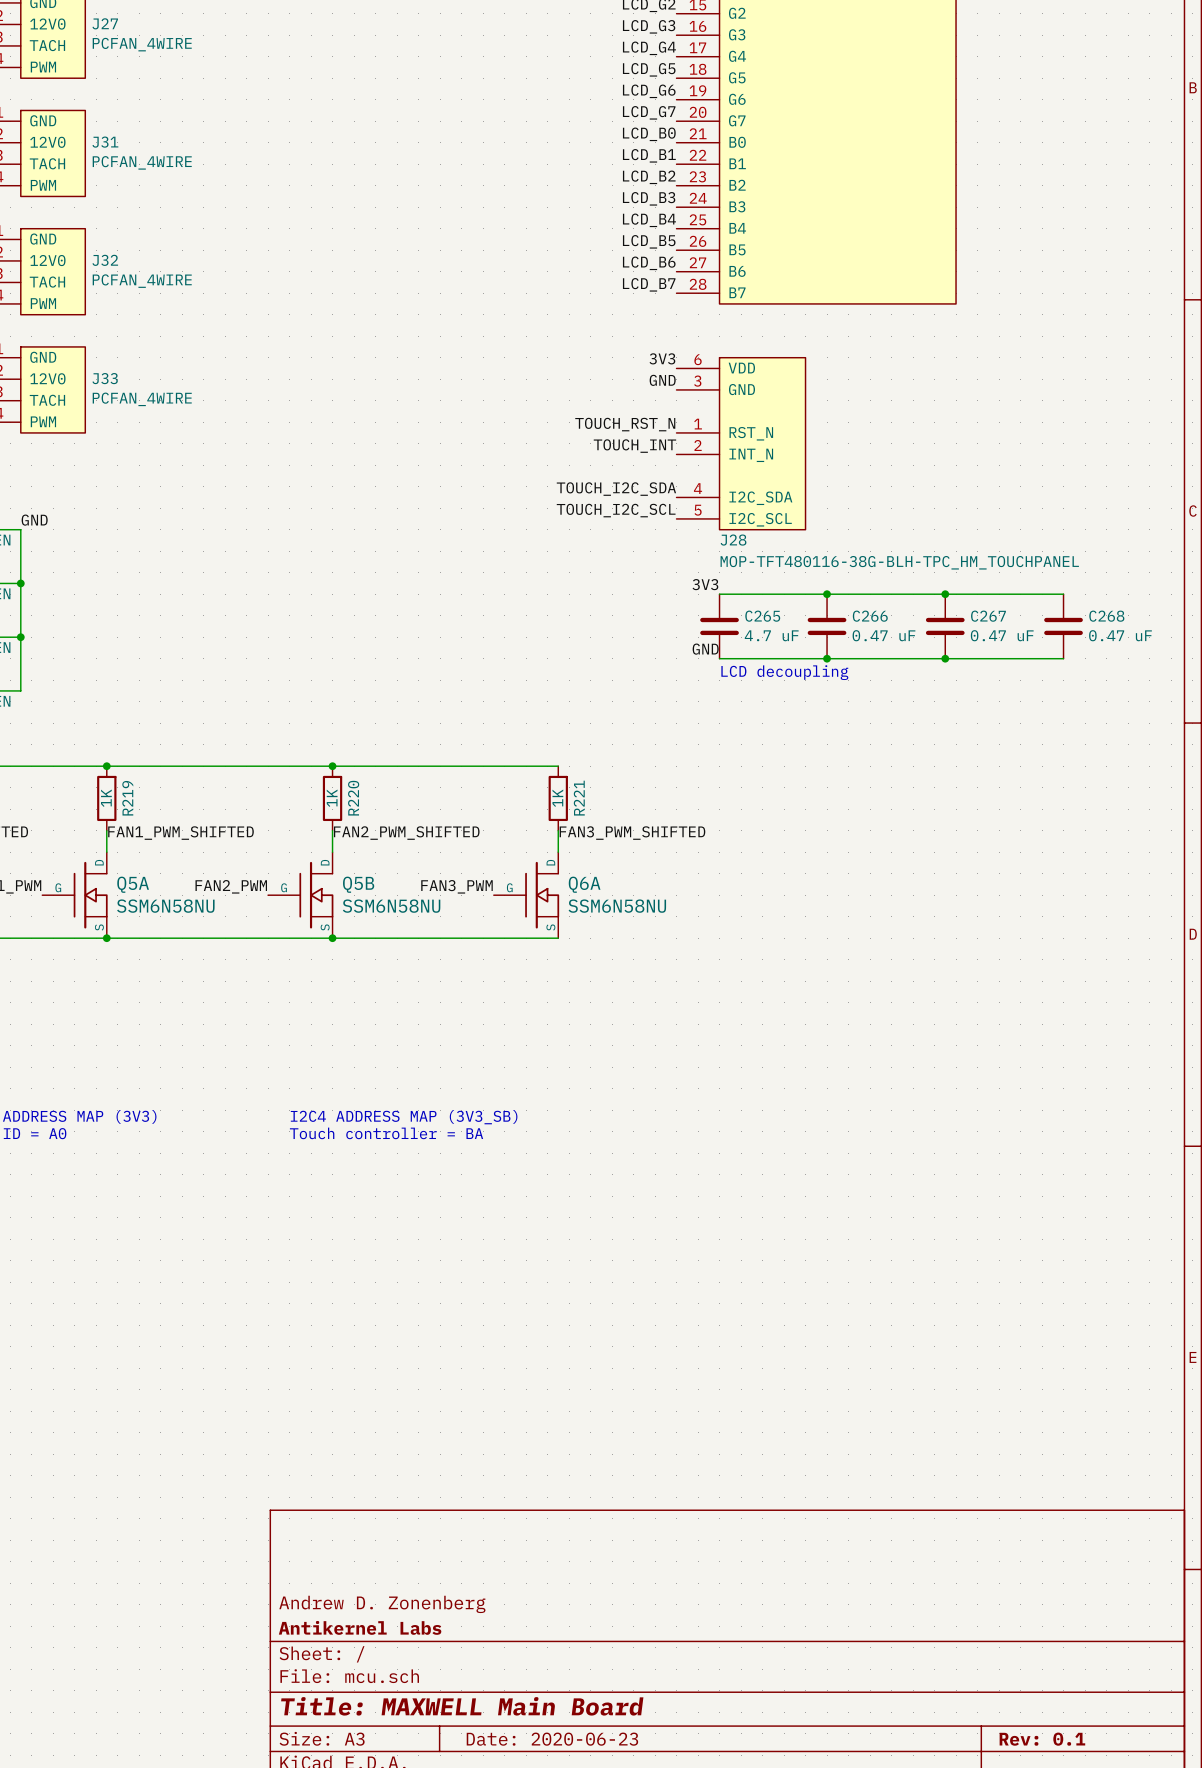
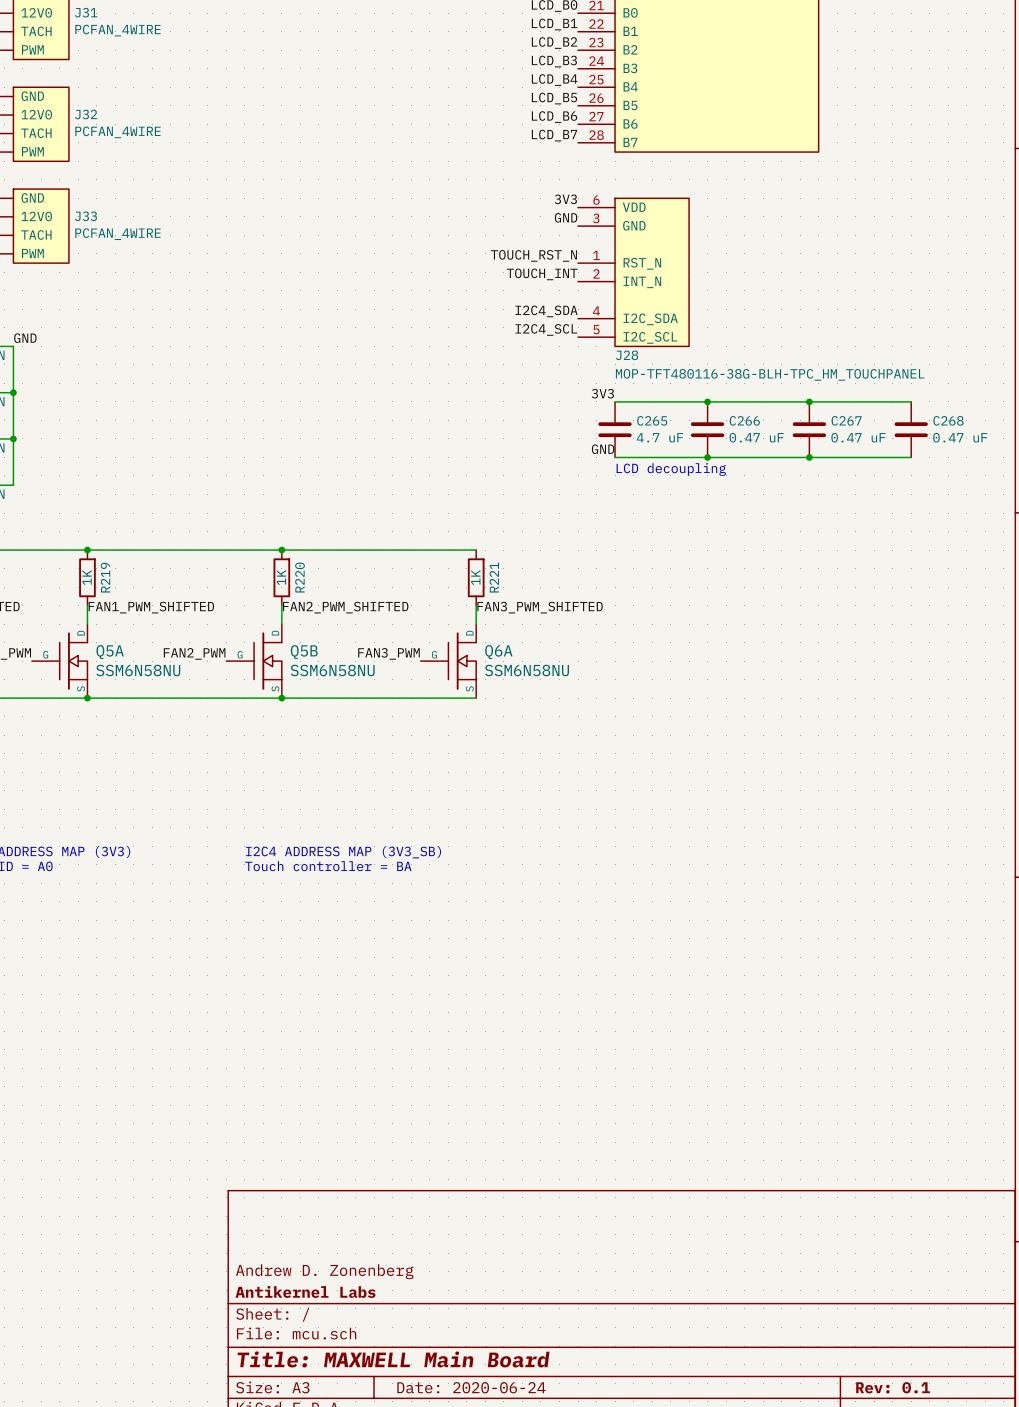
label: TOUCH_I2C_SDA (616, 489) -> I2C4_SDA (546, 311)
label: TOUCH_I2C_SCL (616, 510) -> I2C4_SCL (546, 329)
title block: Date: 2020-06-23 (552, 1739) -> Date: 2020-06-24 (471, 1387)

